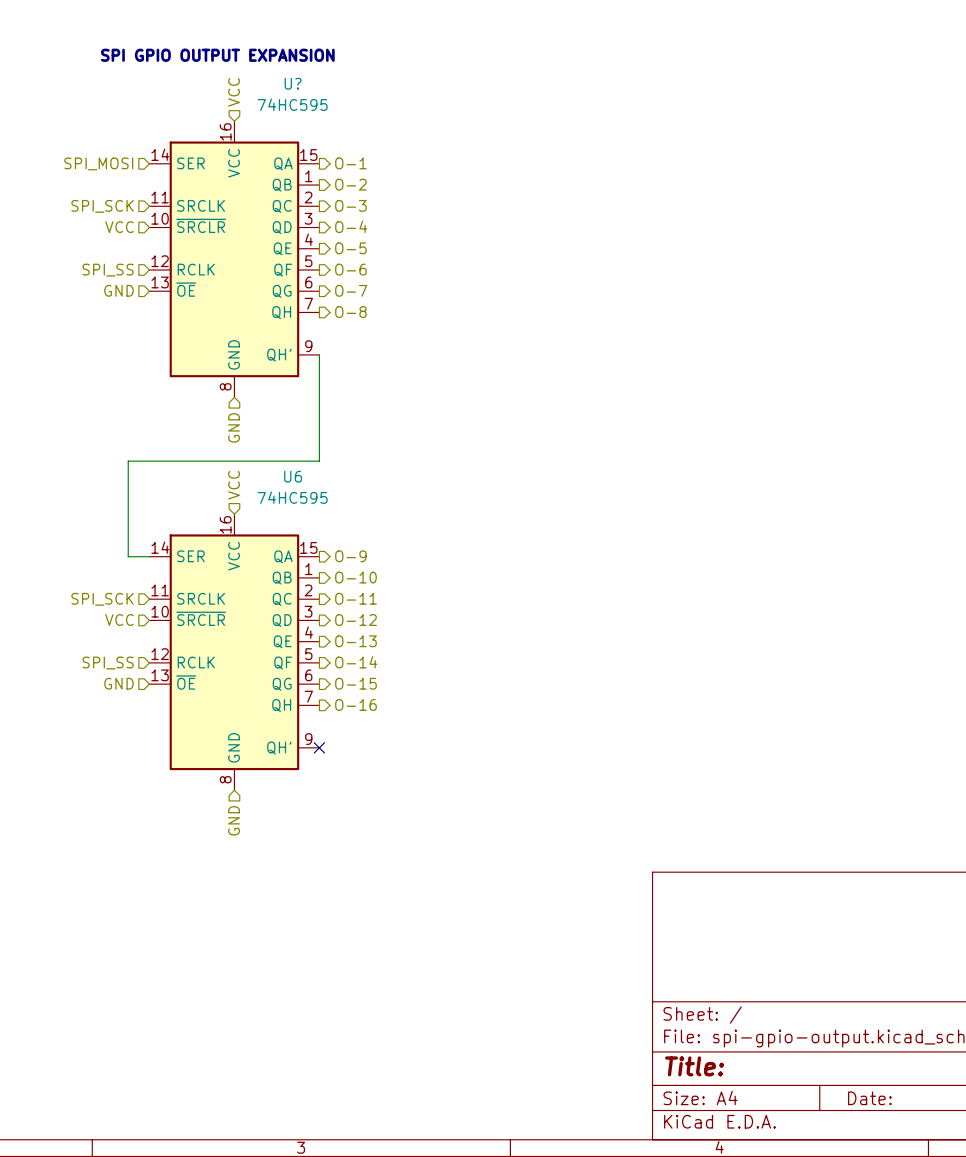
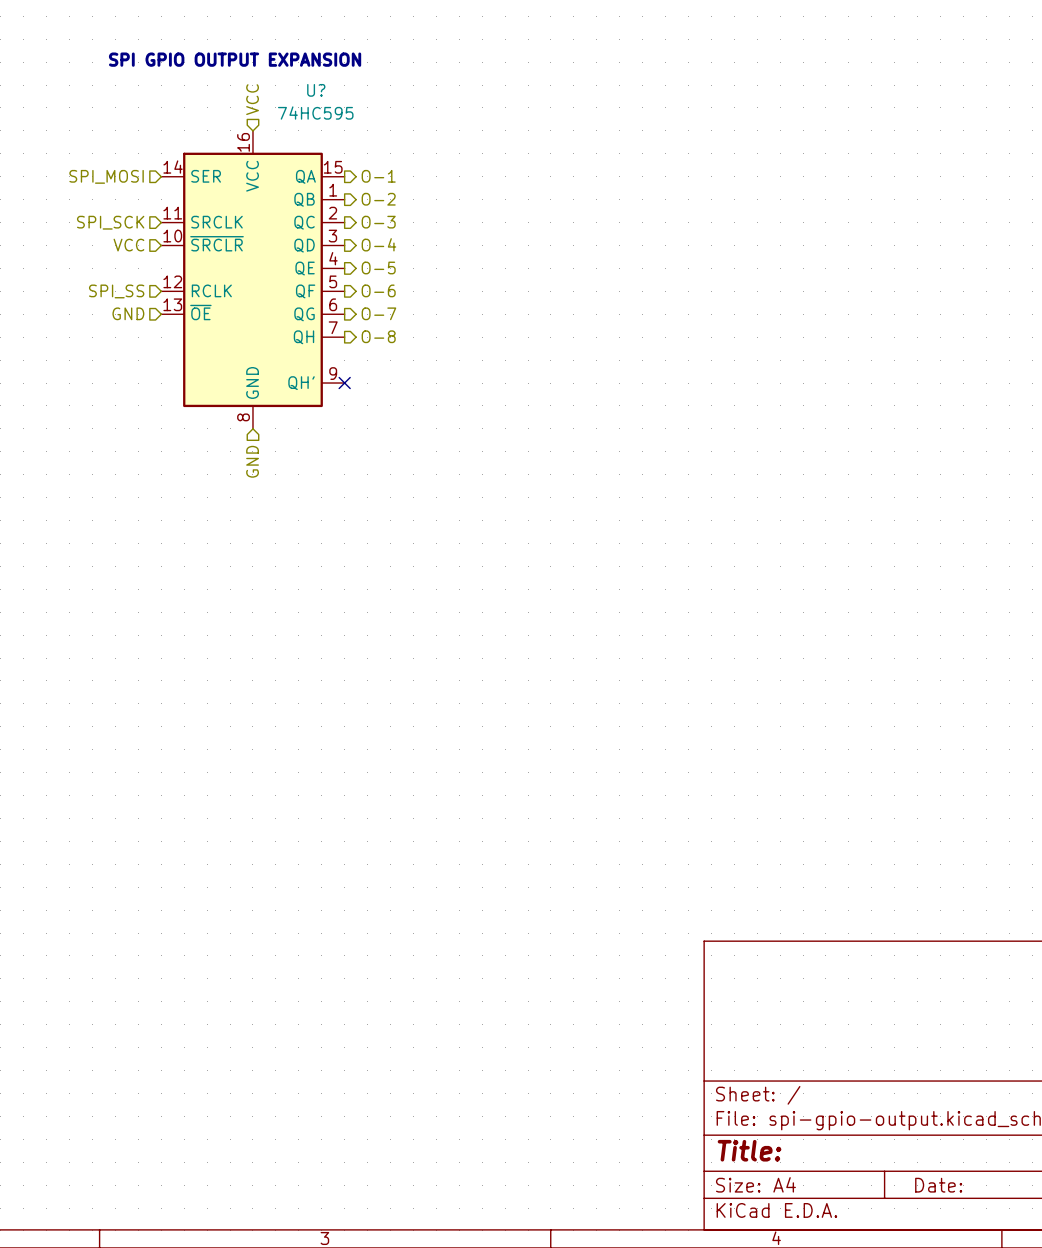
wire: (319, 354) (319, 461) (128, 461) (128, 556) (149, 556) -> none
no-connect mark: none -> (344, 383)
hierarchical label: VCC (234, 485) -> none
hierarchical label: O-9 (350, 556) -> none
hierarchical label: O-10 (355, 577) -> none
hierarchical label: O-11 (355, 598) -> none
hierarchical label: SPI_SCK (102, 599) -> none
hierarchical label: VCC (119, 620) -> none
hierarchical label: O-12 (355, 620) -> none
hierarchical label: O-13 (355, 641) -> none
U6: 74HC595 (234, 652) -> none
hierarchical label: O-14 (356, 662) -> none
hierarchical label: SPI_SS (108, 663) -> none
hierarchical label: GND (118, 683) -> none
hierarchical label: O-15 (355, 683) -> none
hierarchical label: O-16 (355, 704) -> none
no-connect mark: (319, 747) -> none
hierarchical label: GND (234, 820) -> none

